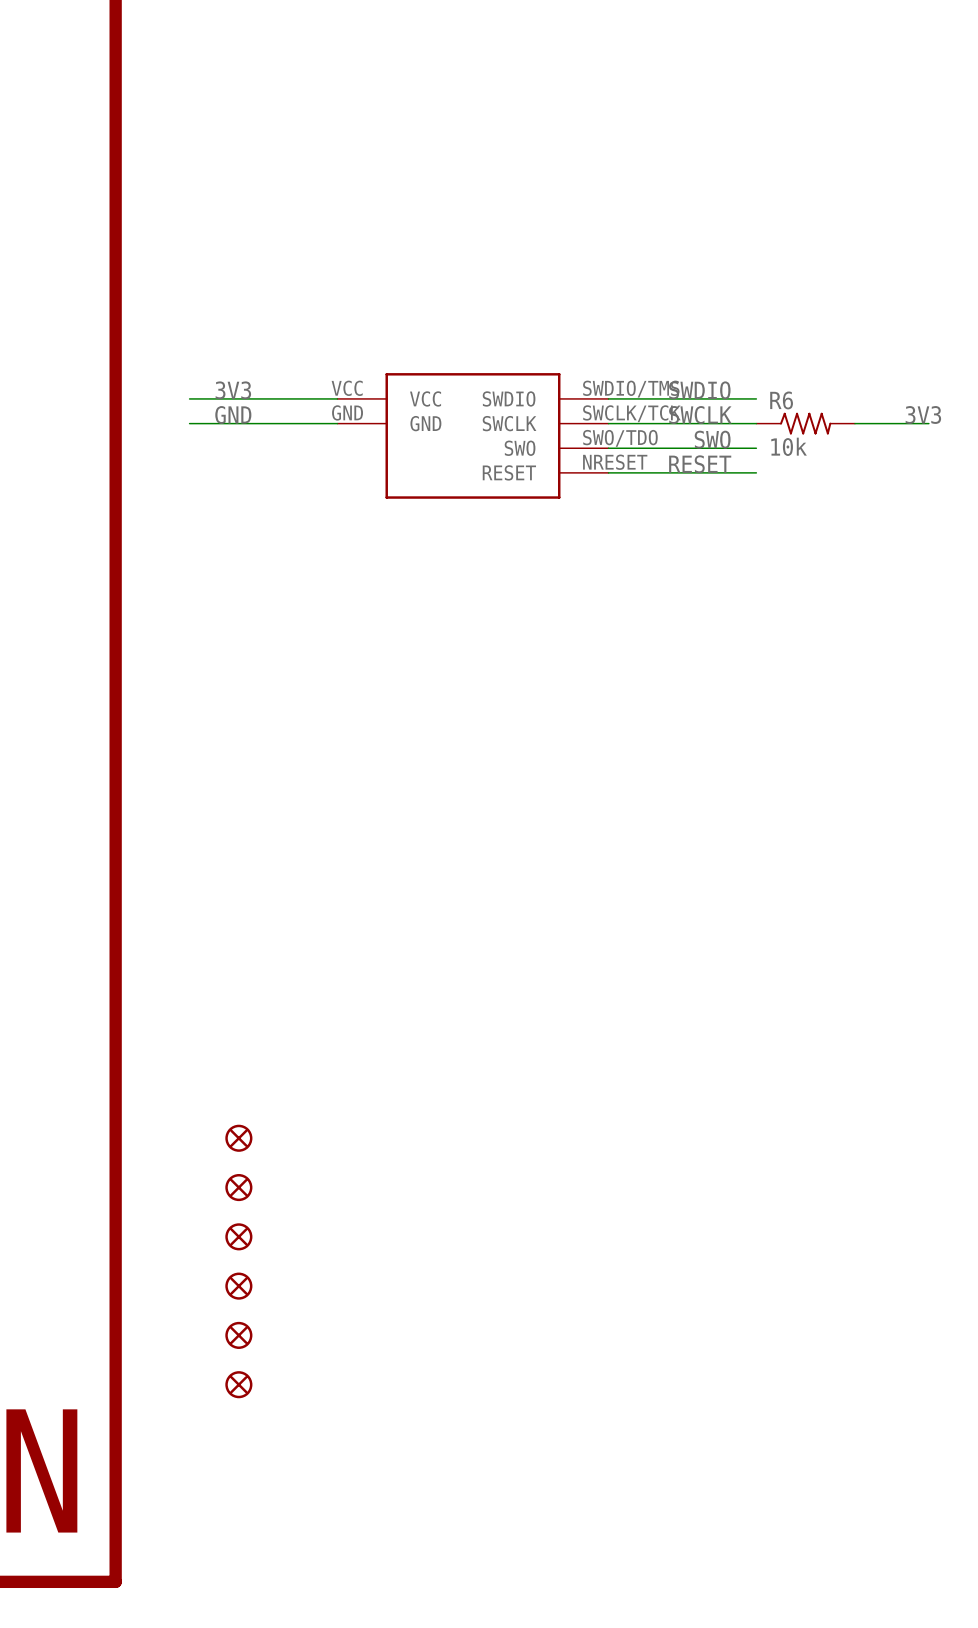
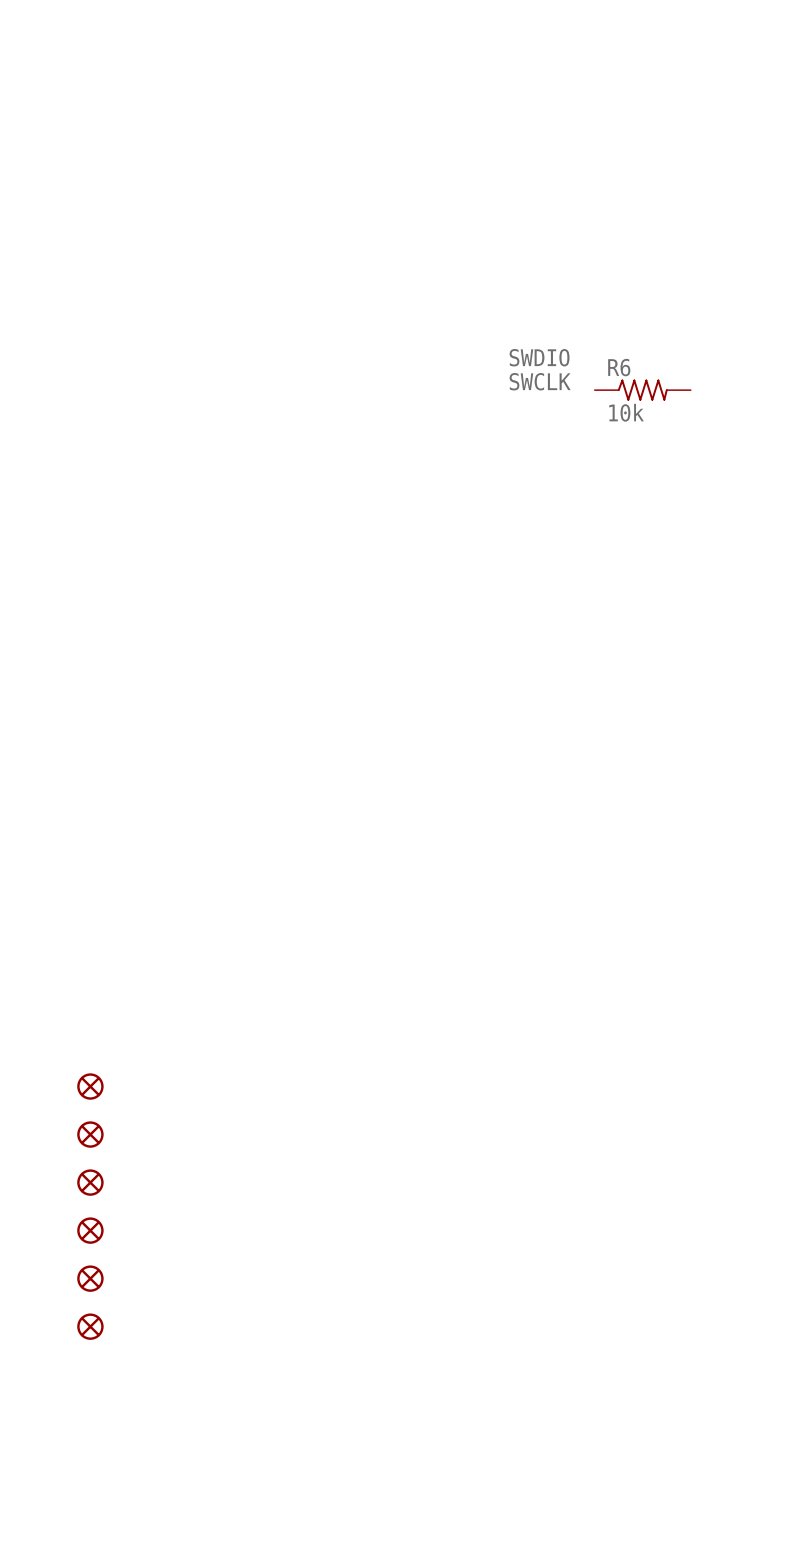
label: 3V3 (233, 390) -> none
wire: (189, 398) (337, 398) -> none
wire: (608, 398) (756, 398) -> none
label: GND (233, 414) -> none
label: 3V3 (923, 414) -> none
wire: (189, 423) (337, 423) -> none
wire: (608, 423) (756, 423) -> none
wire: (854, 423) (928, 423) -> none
part: (472, 435) -> none
label: SWO (712, 439) -> none
wire: (608, 448) (756, 448) -> none
label: RESET (700, 464) -> none
wire: (608, 472) (756, 472) -> none

